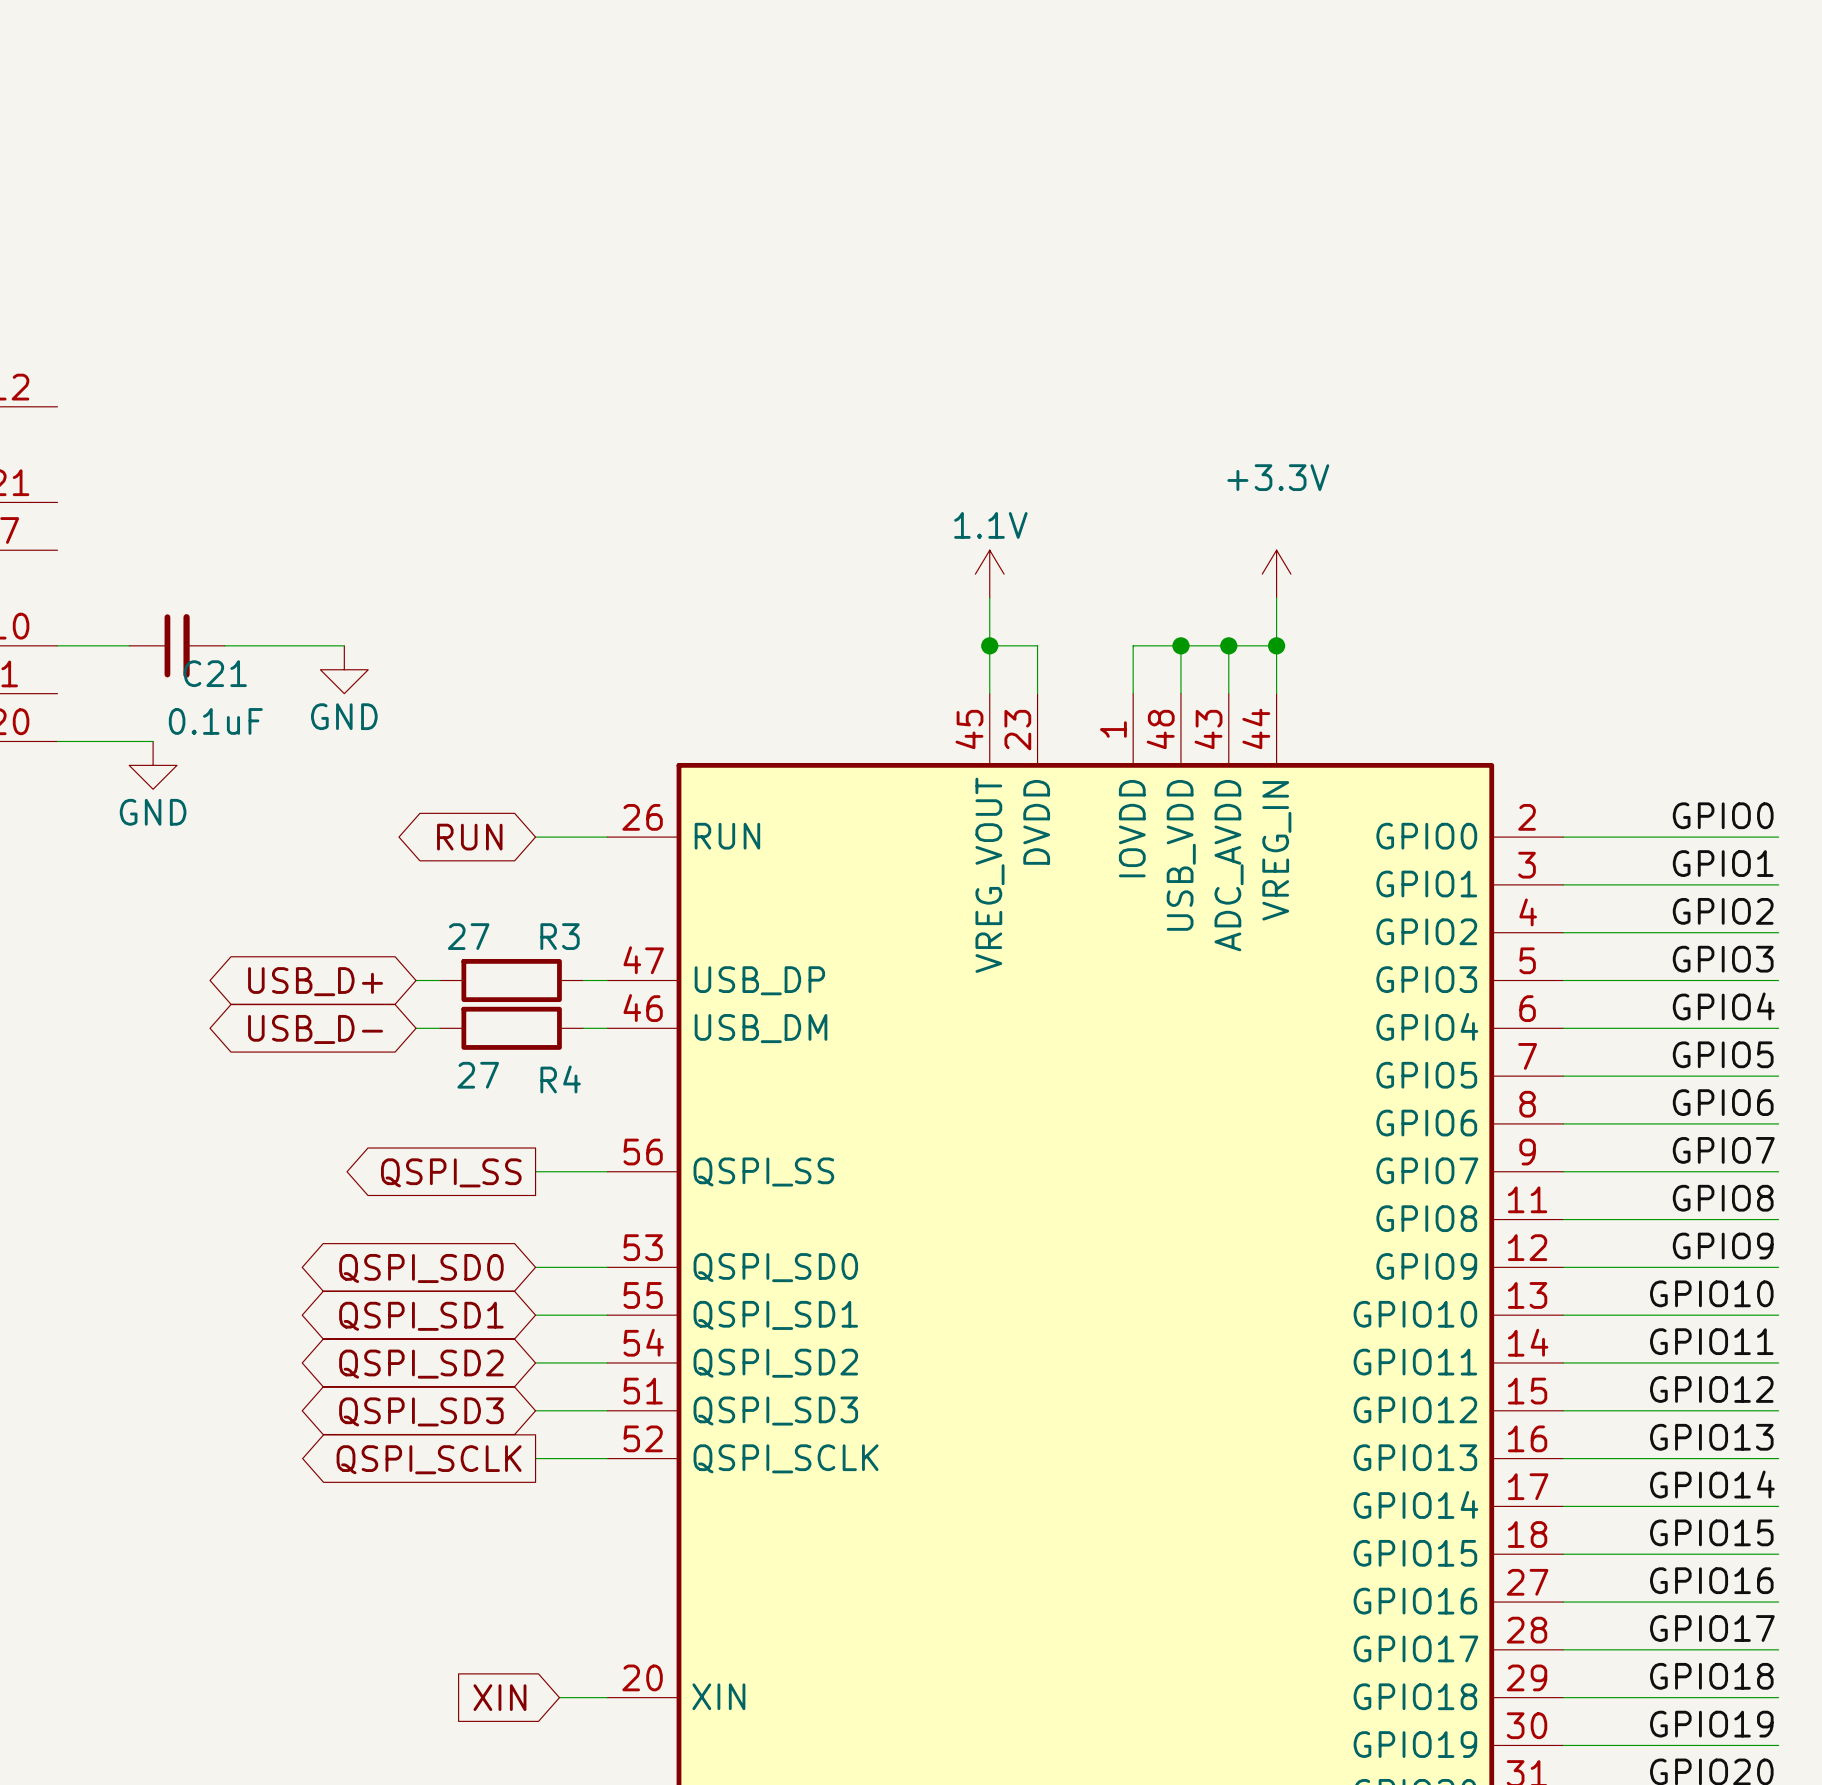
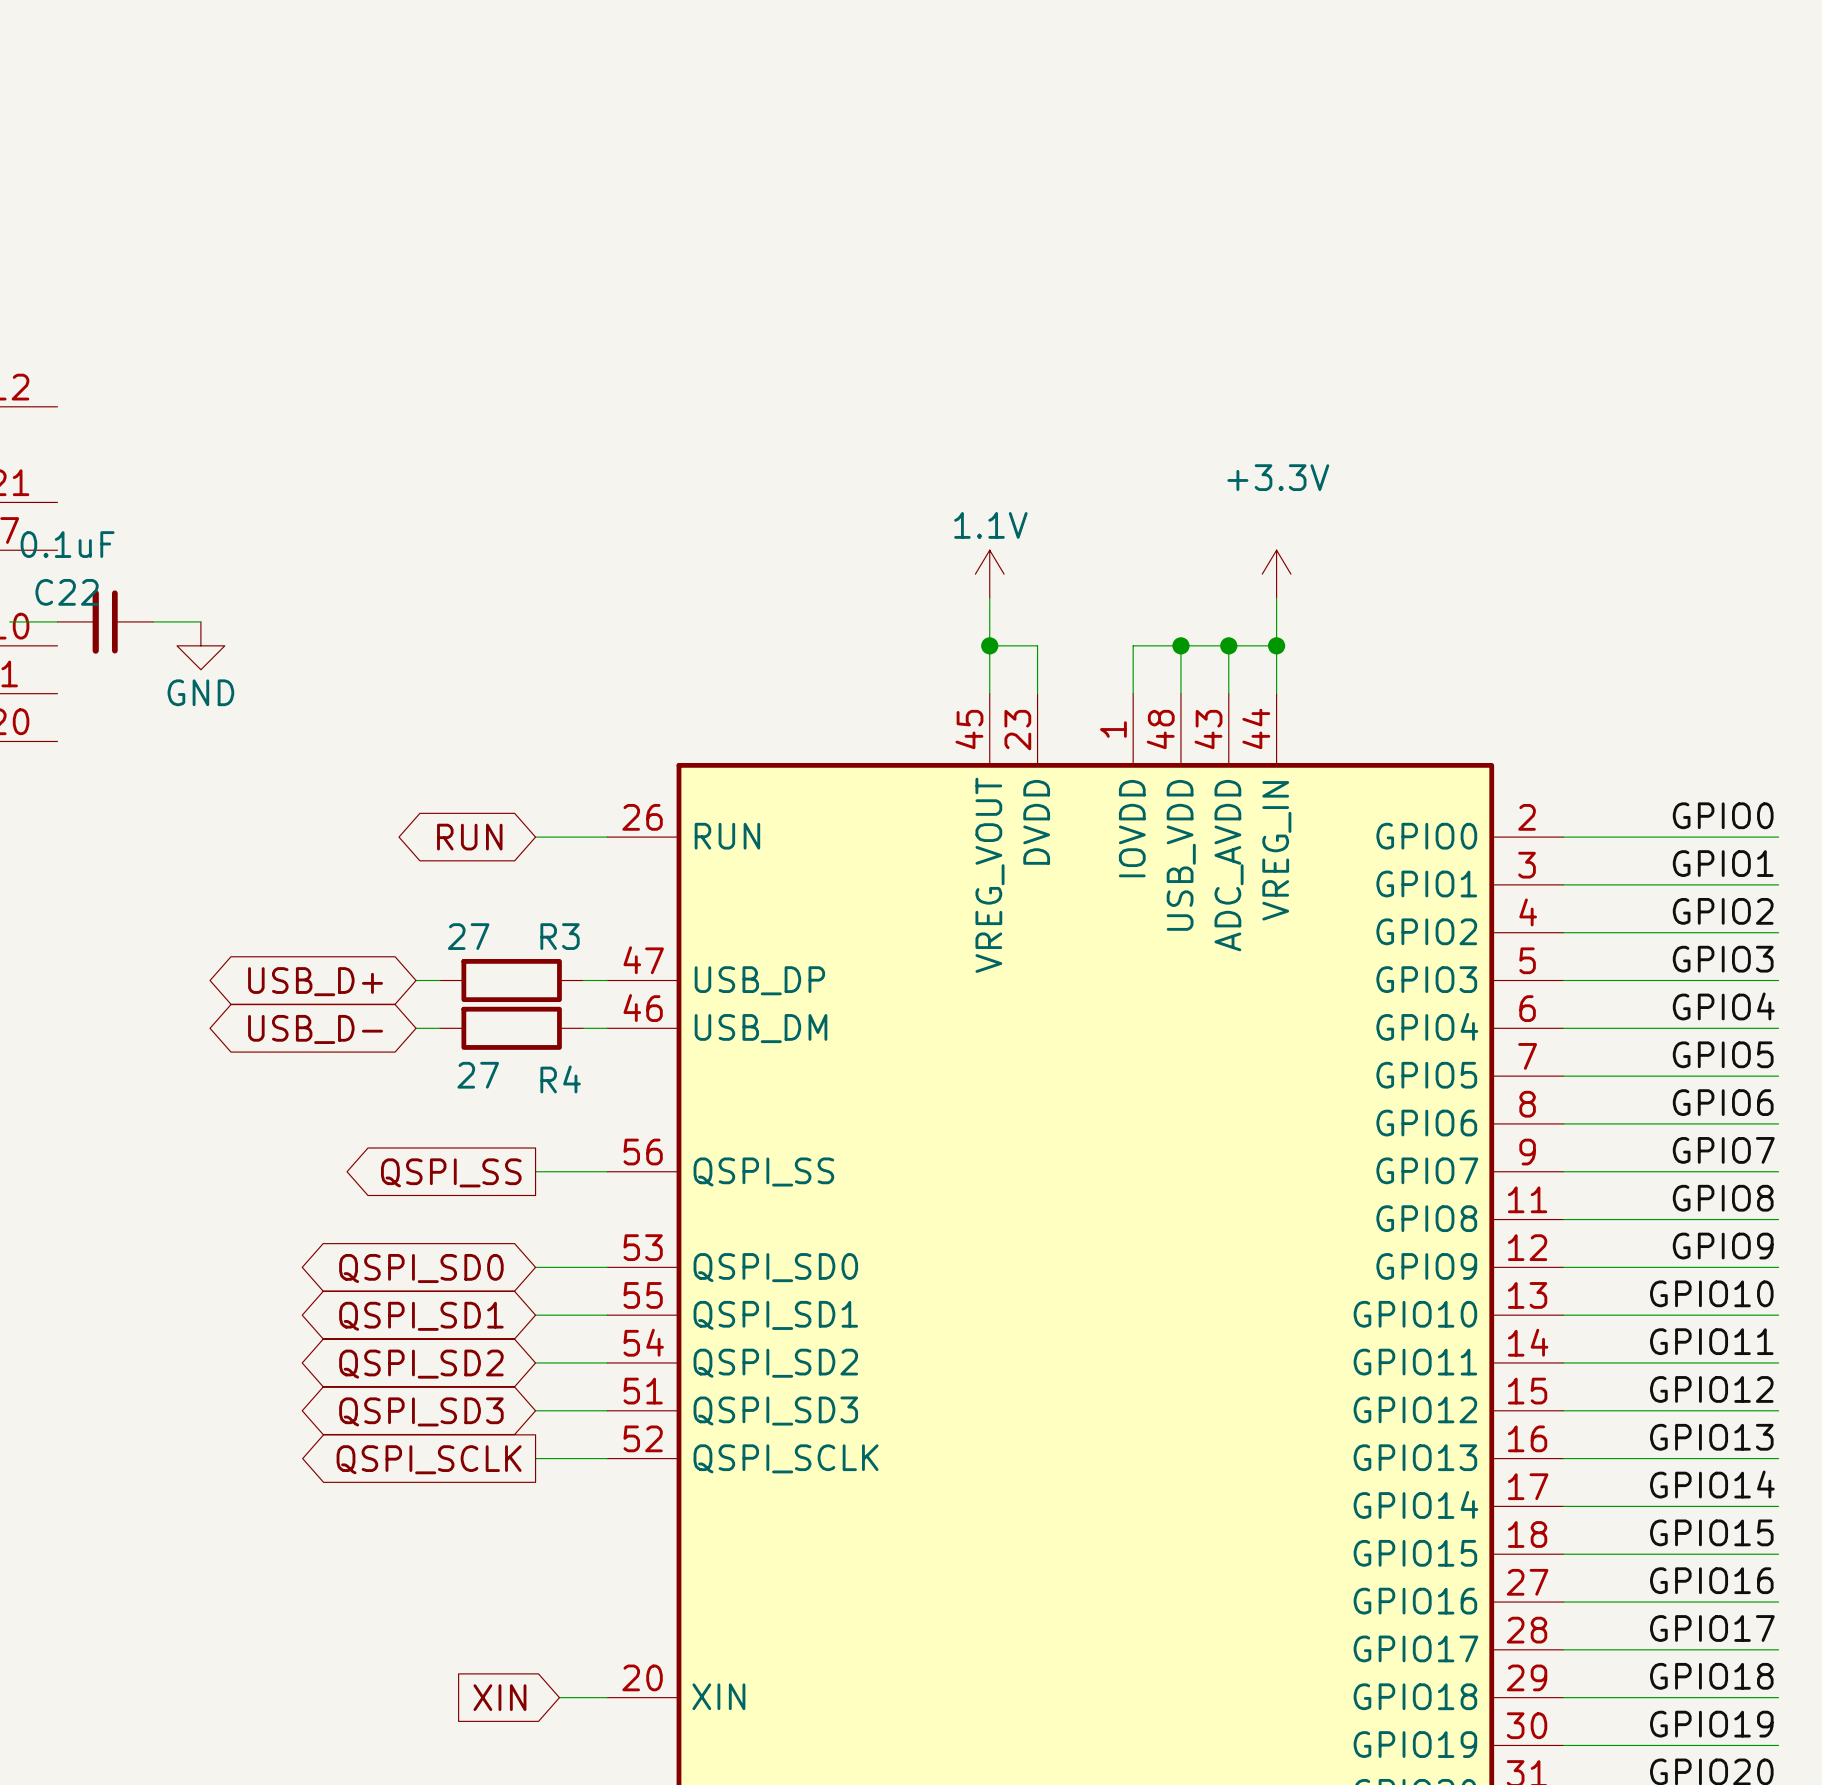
wire: none -> (9, 621) (57, 621)
C22: none -> 0.1uF (105, 621)
wire: none -> (153, 621) (200, 621)
wire: (57, 645) (129, 645) -> none
C21: 0.1uF (177, 645) -> none
power symbol: none -> GND (200, 645)
wire: (224, 645) (344, 645) -> none
power symbol: GND (344, 669) -> none
wire: (57, 741) (153, 741) -> none
power symbol: GND (153, 765) -> none

